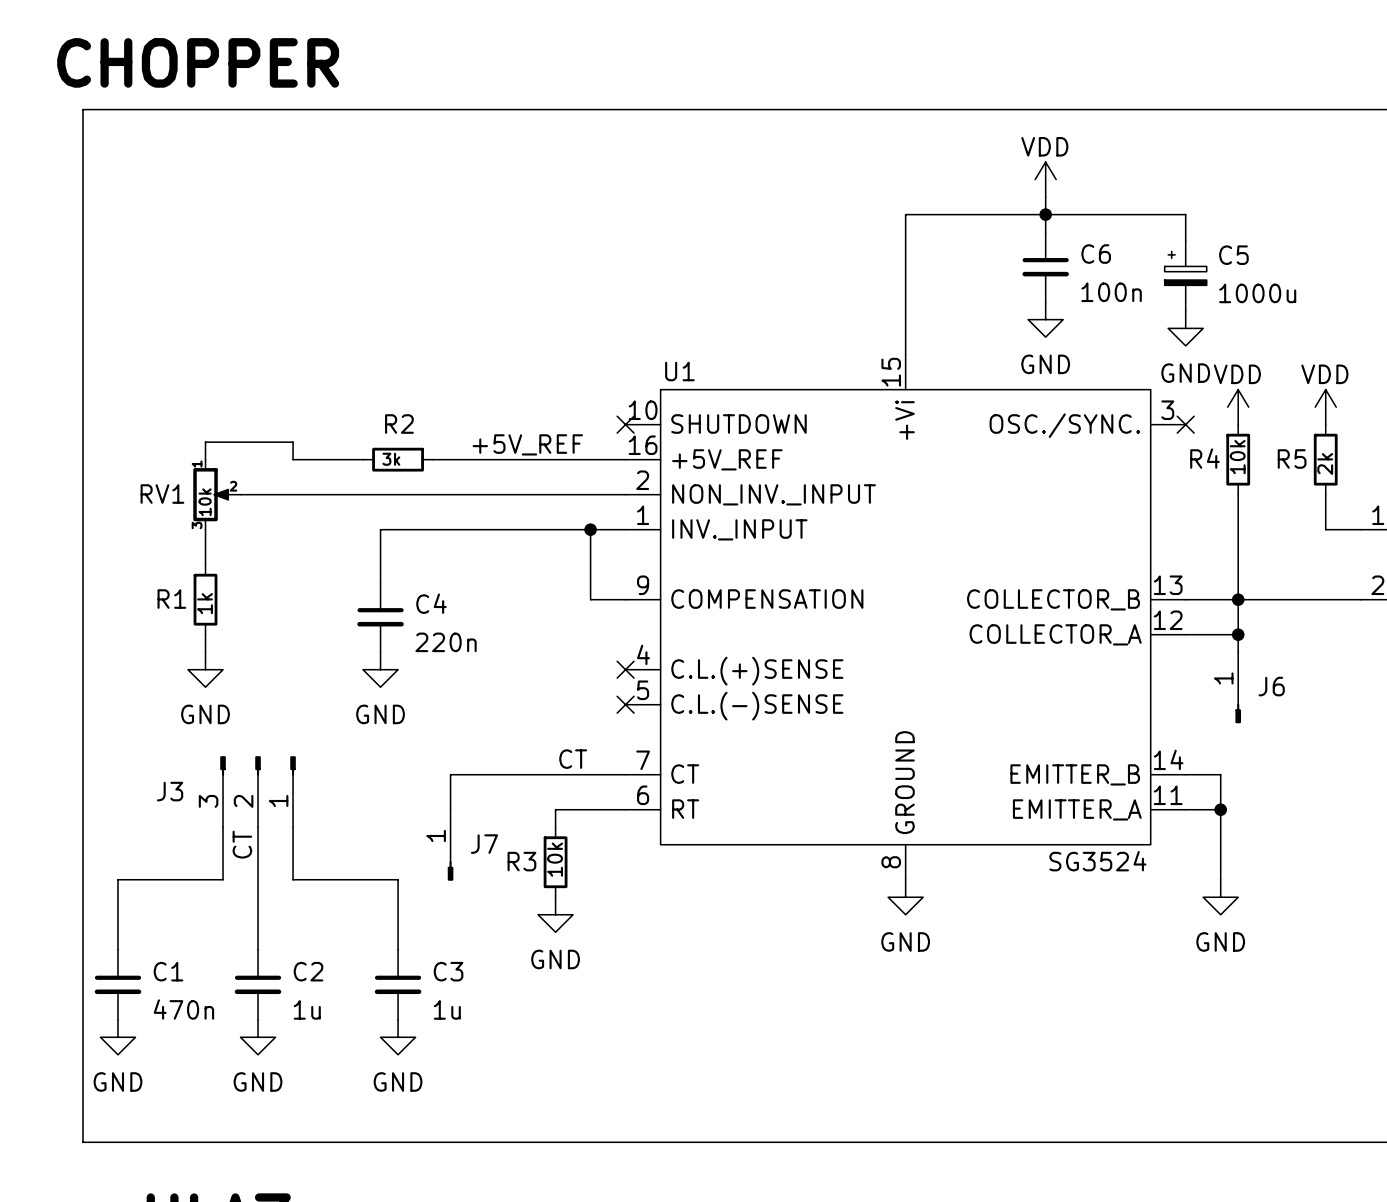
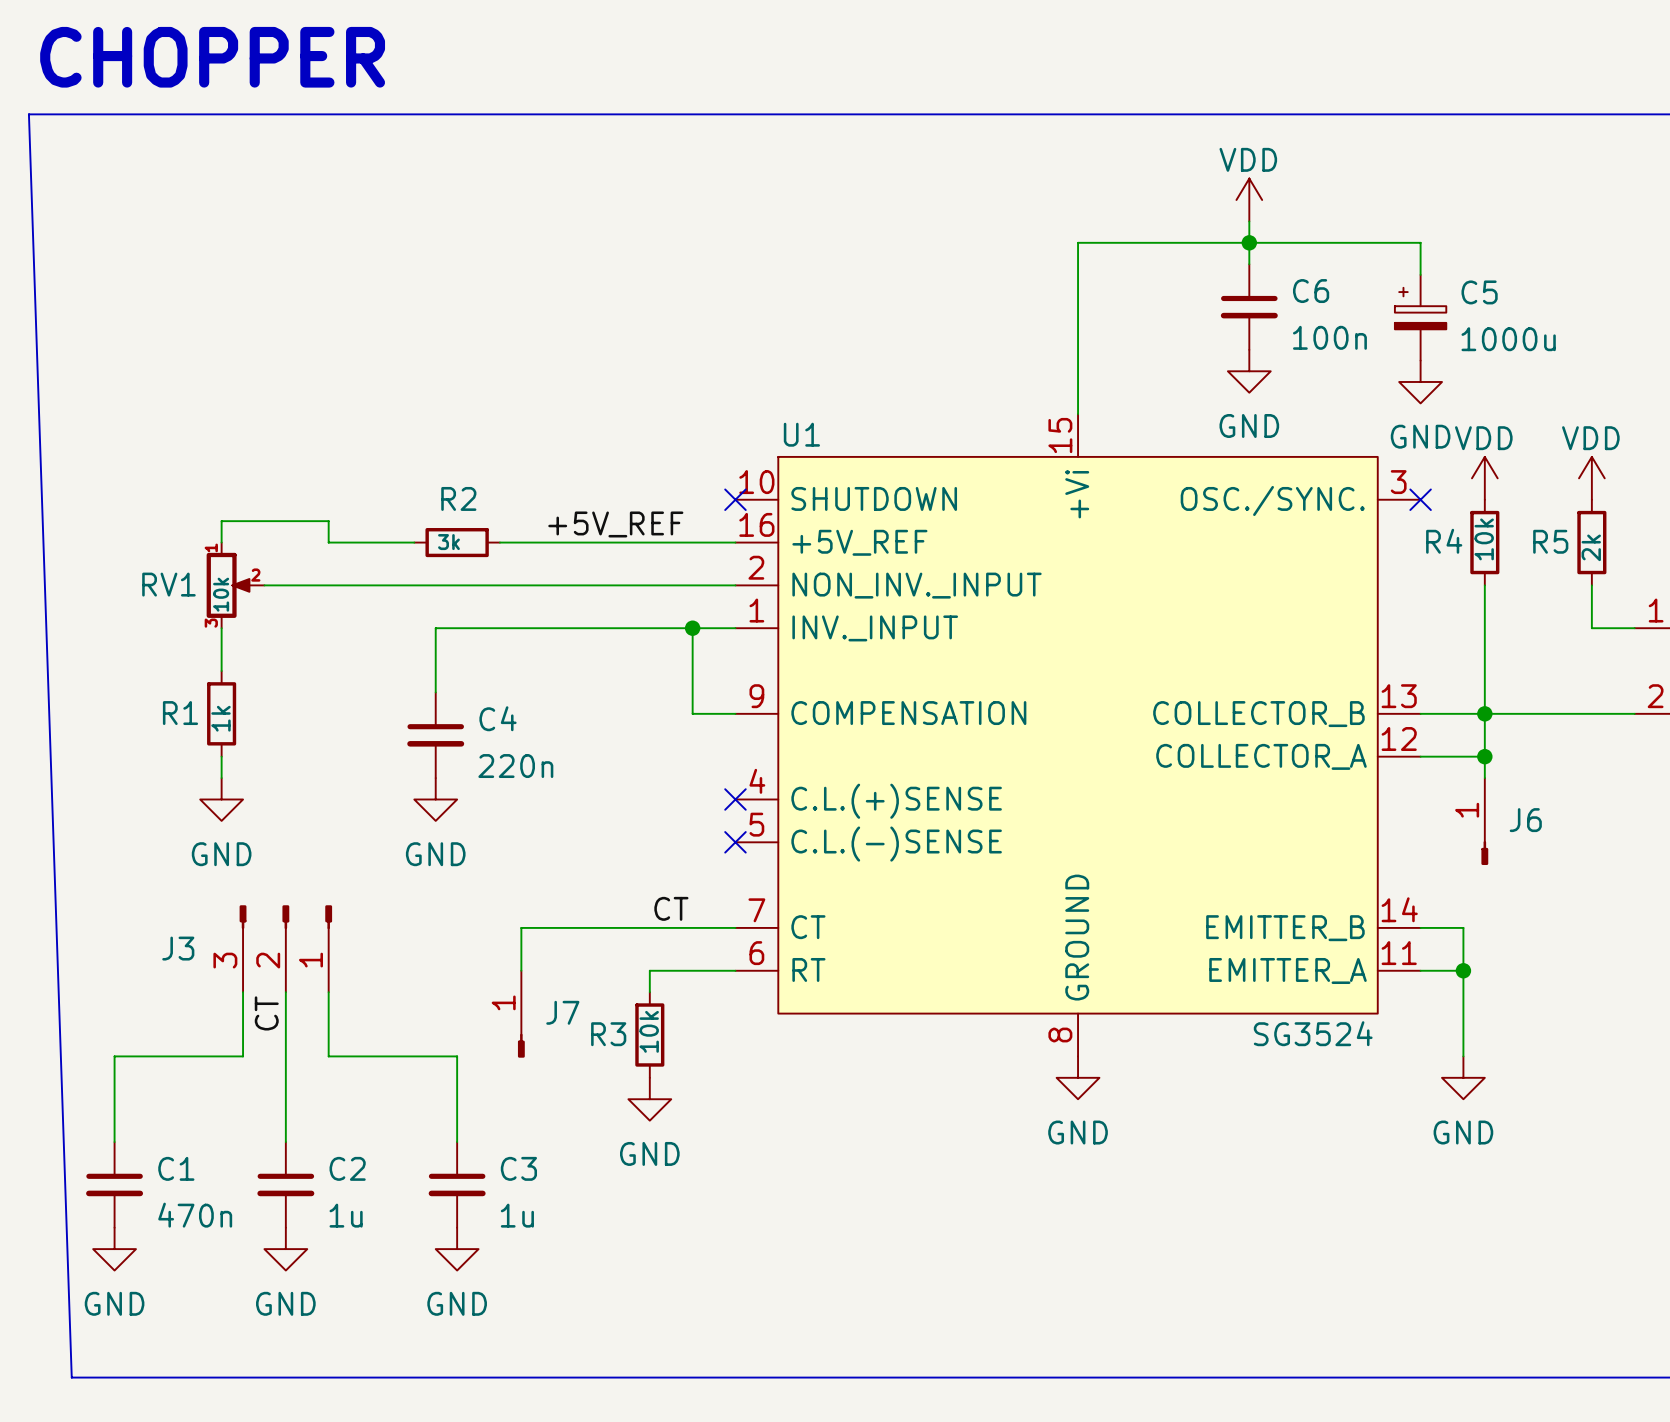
line: (82, 109) (82, 1142) -> (71, 114) (28, 114) (71, 1377)

